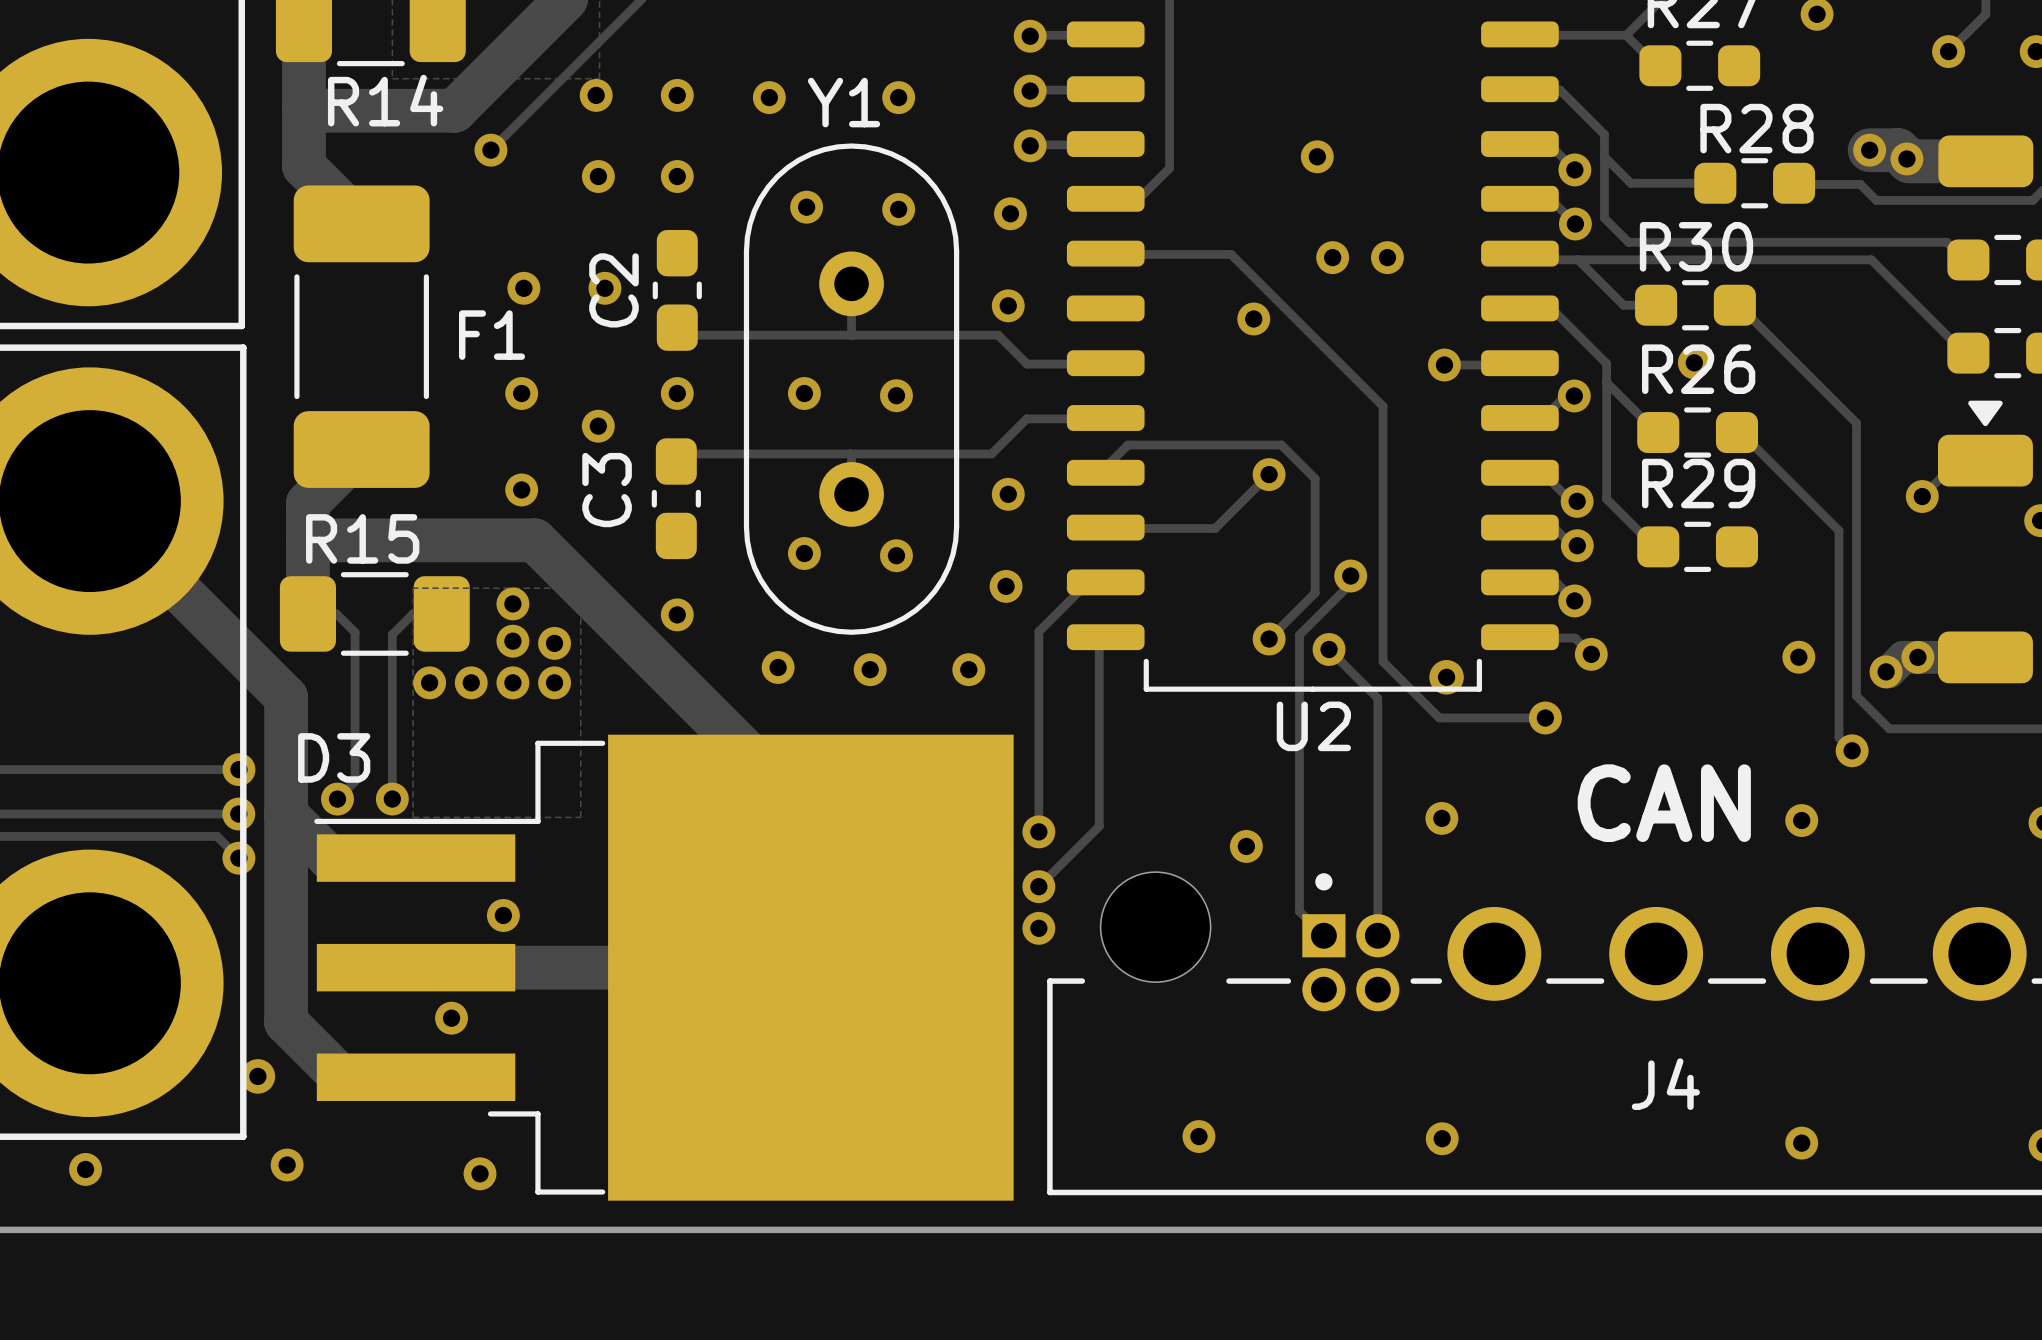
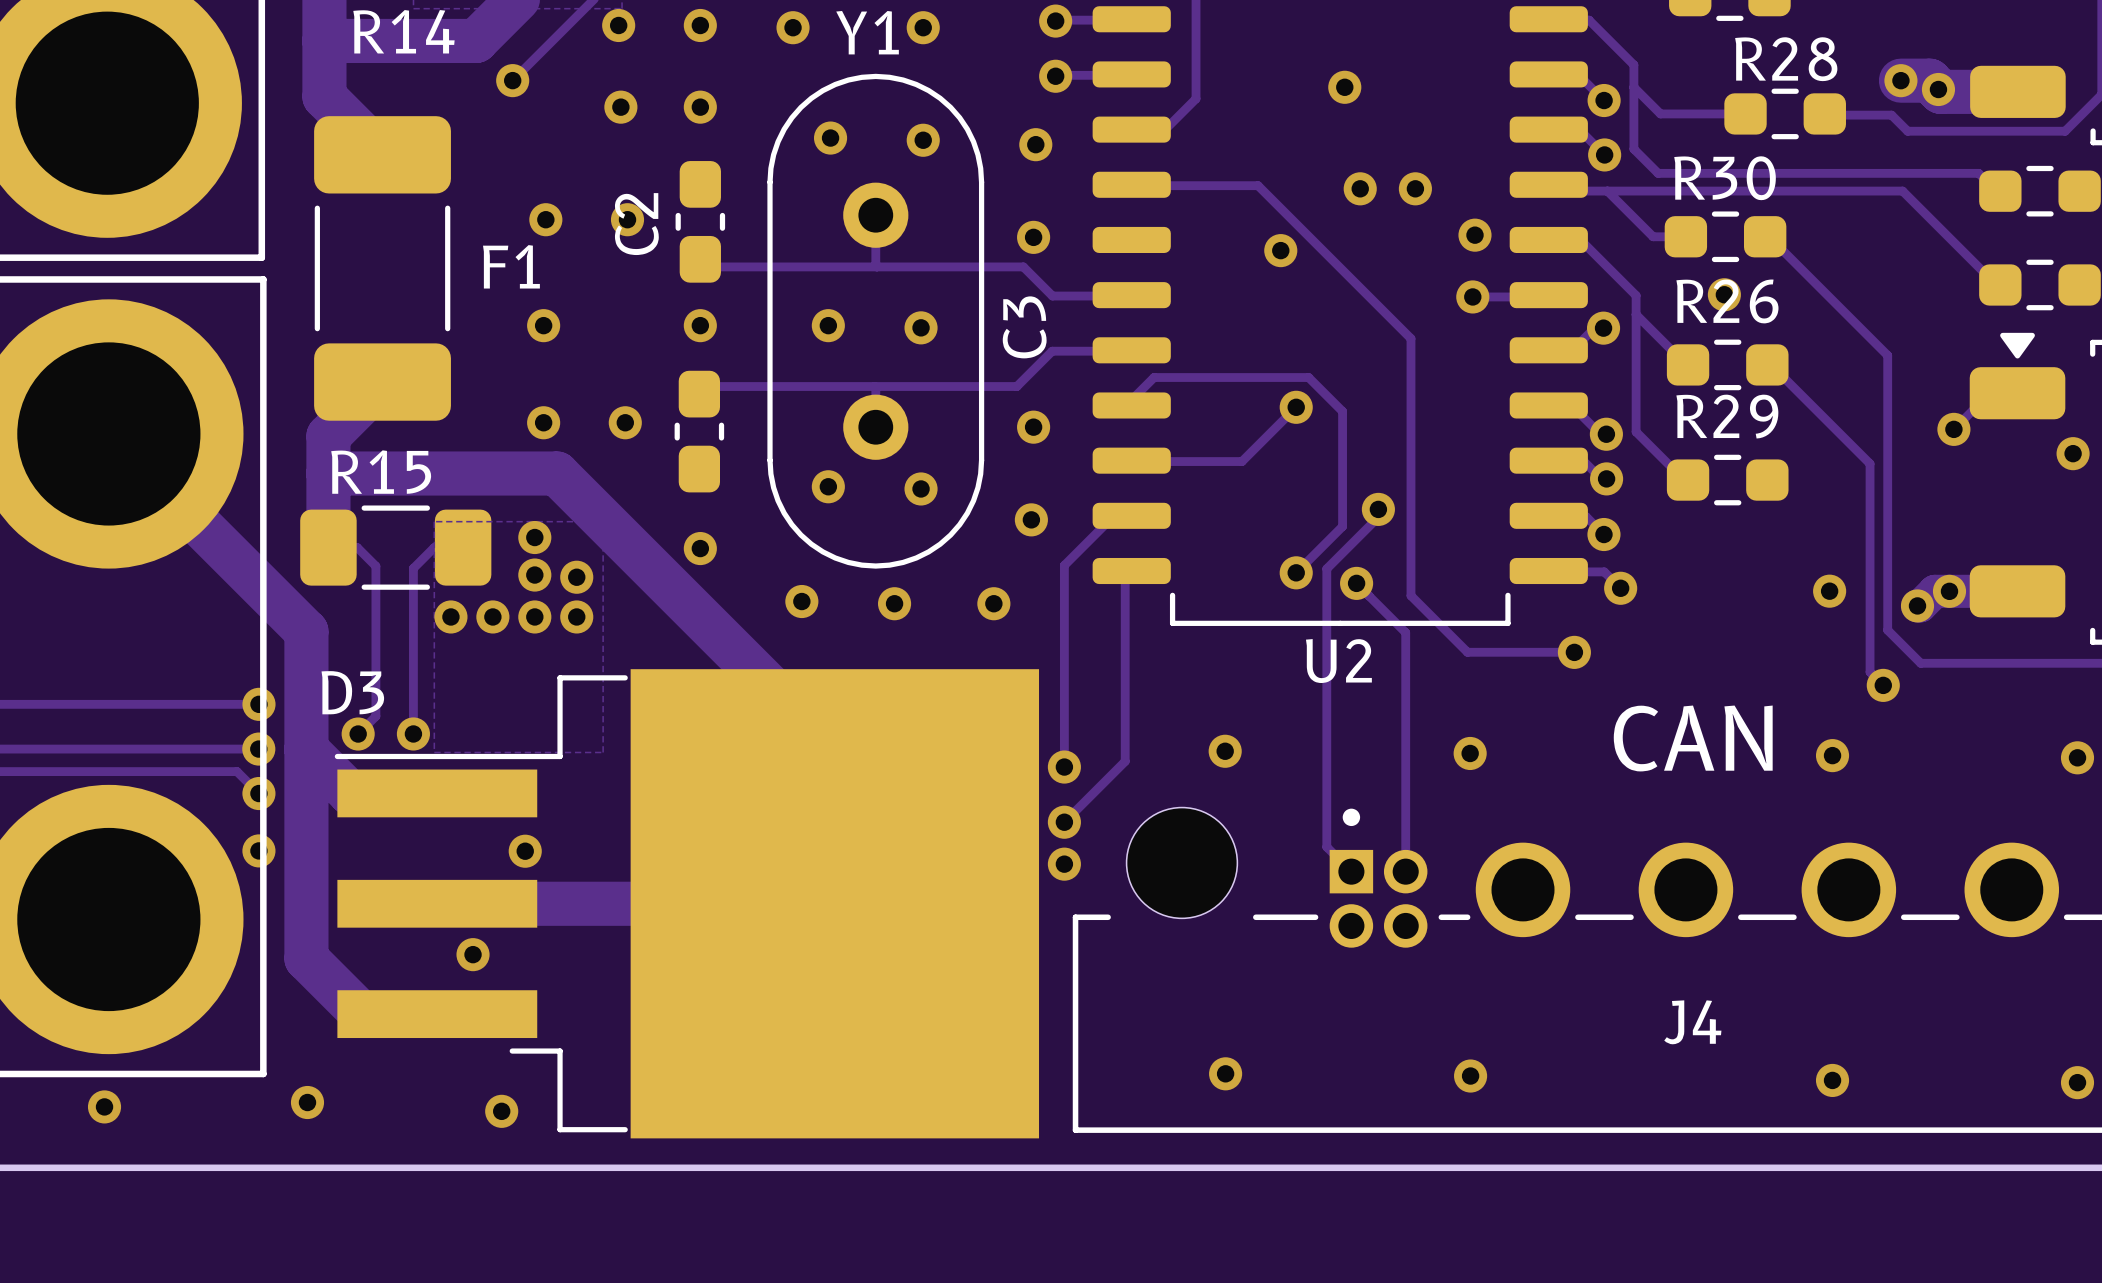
via: none -> (1474, 235)
via position: (598, 426) -> (625, 422)
C3 name position: C3 (607, 490) -> C3 (1024, 327)
via: (1446, 677) -> none
via position: (1246, 846) -> (1225, 751)
via: none -> (258, 850)
via: (257, 1076) -> none

